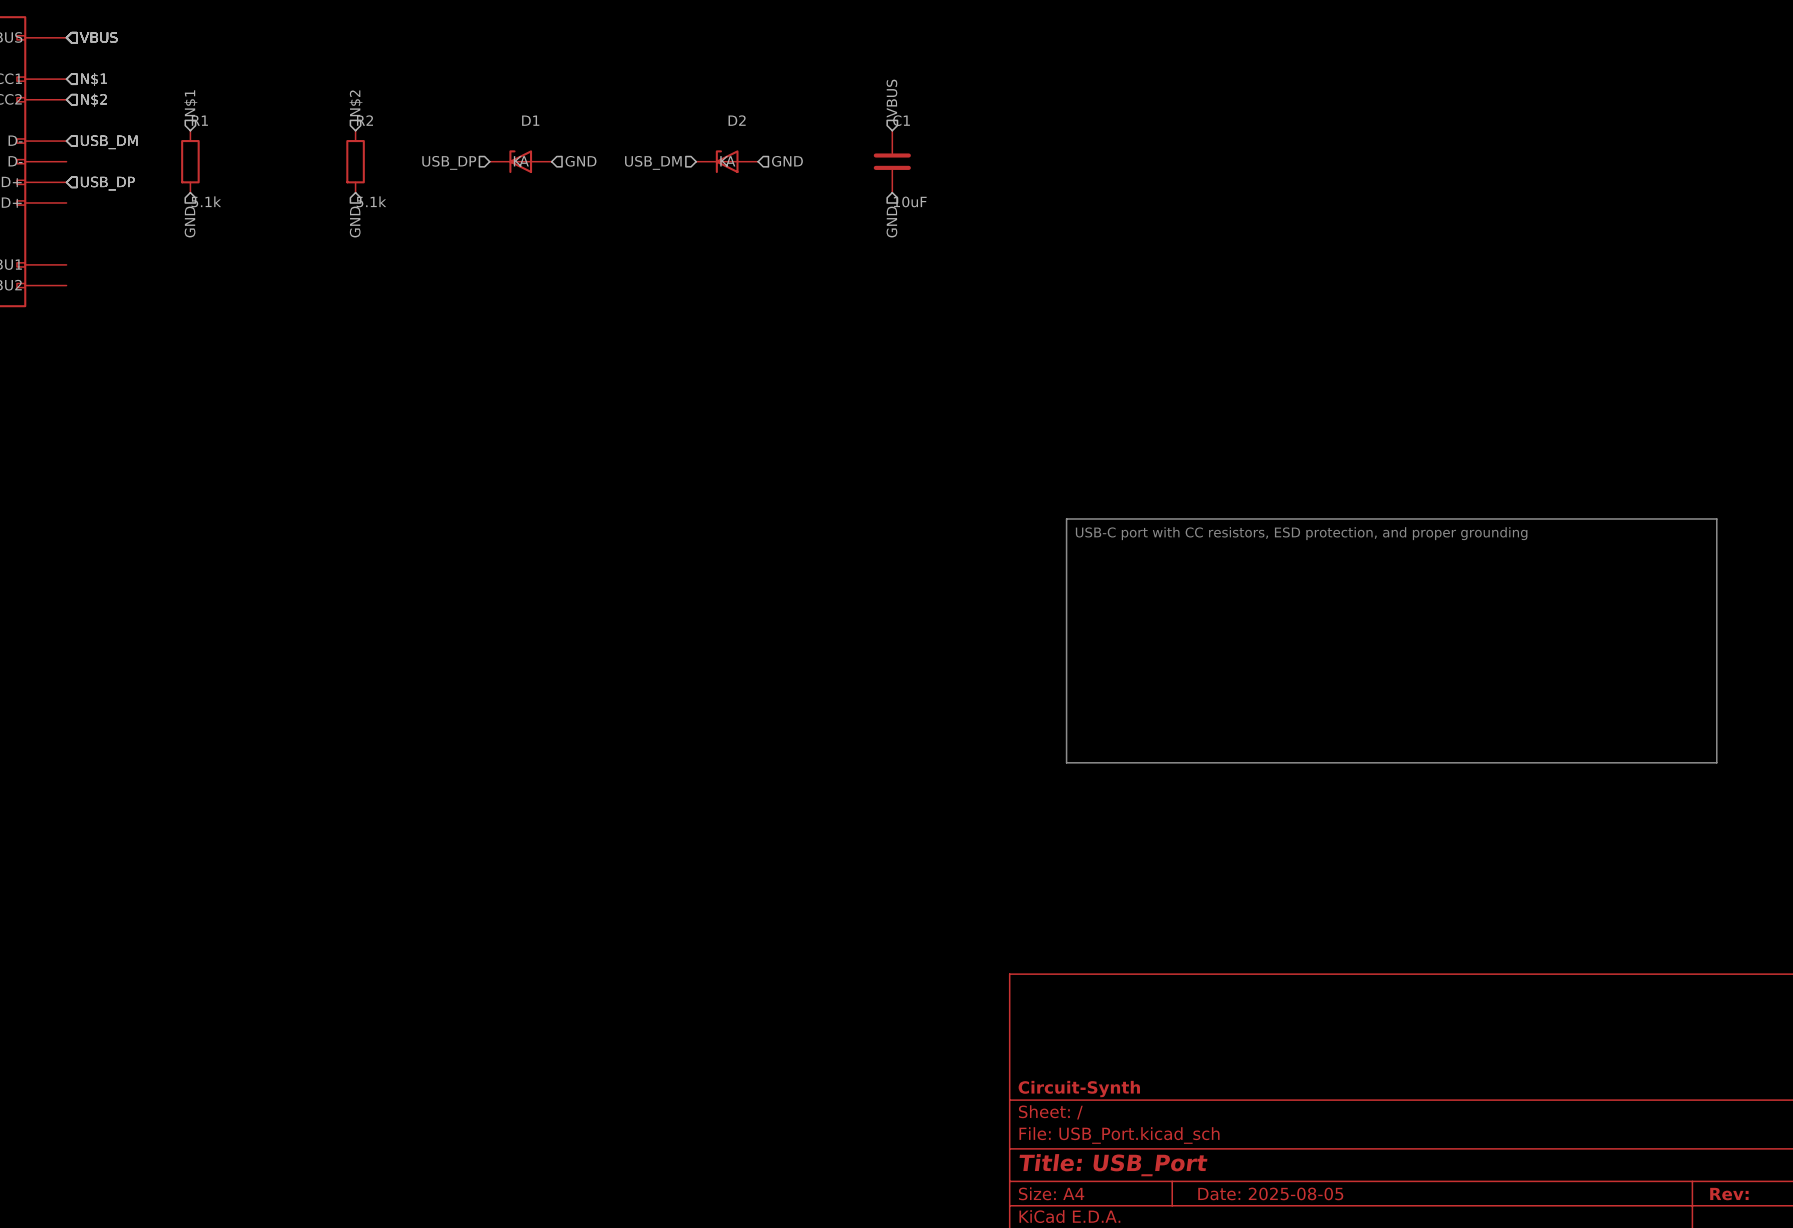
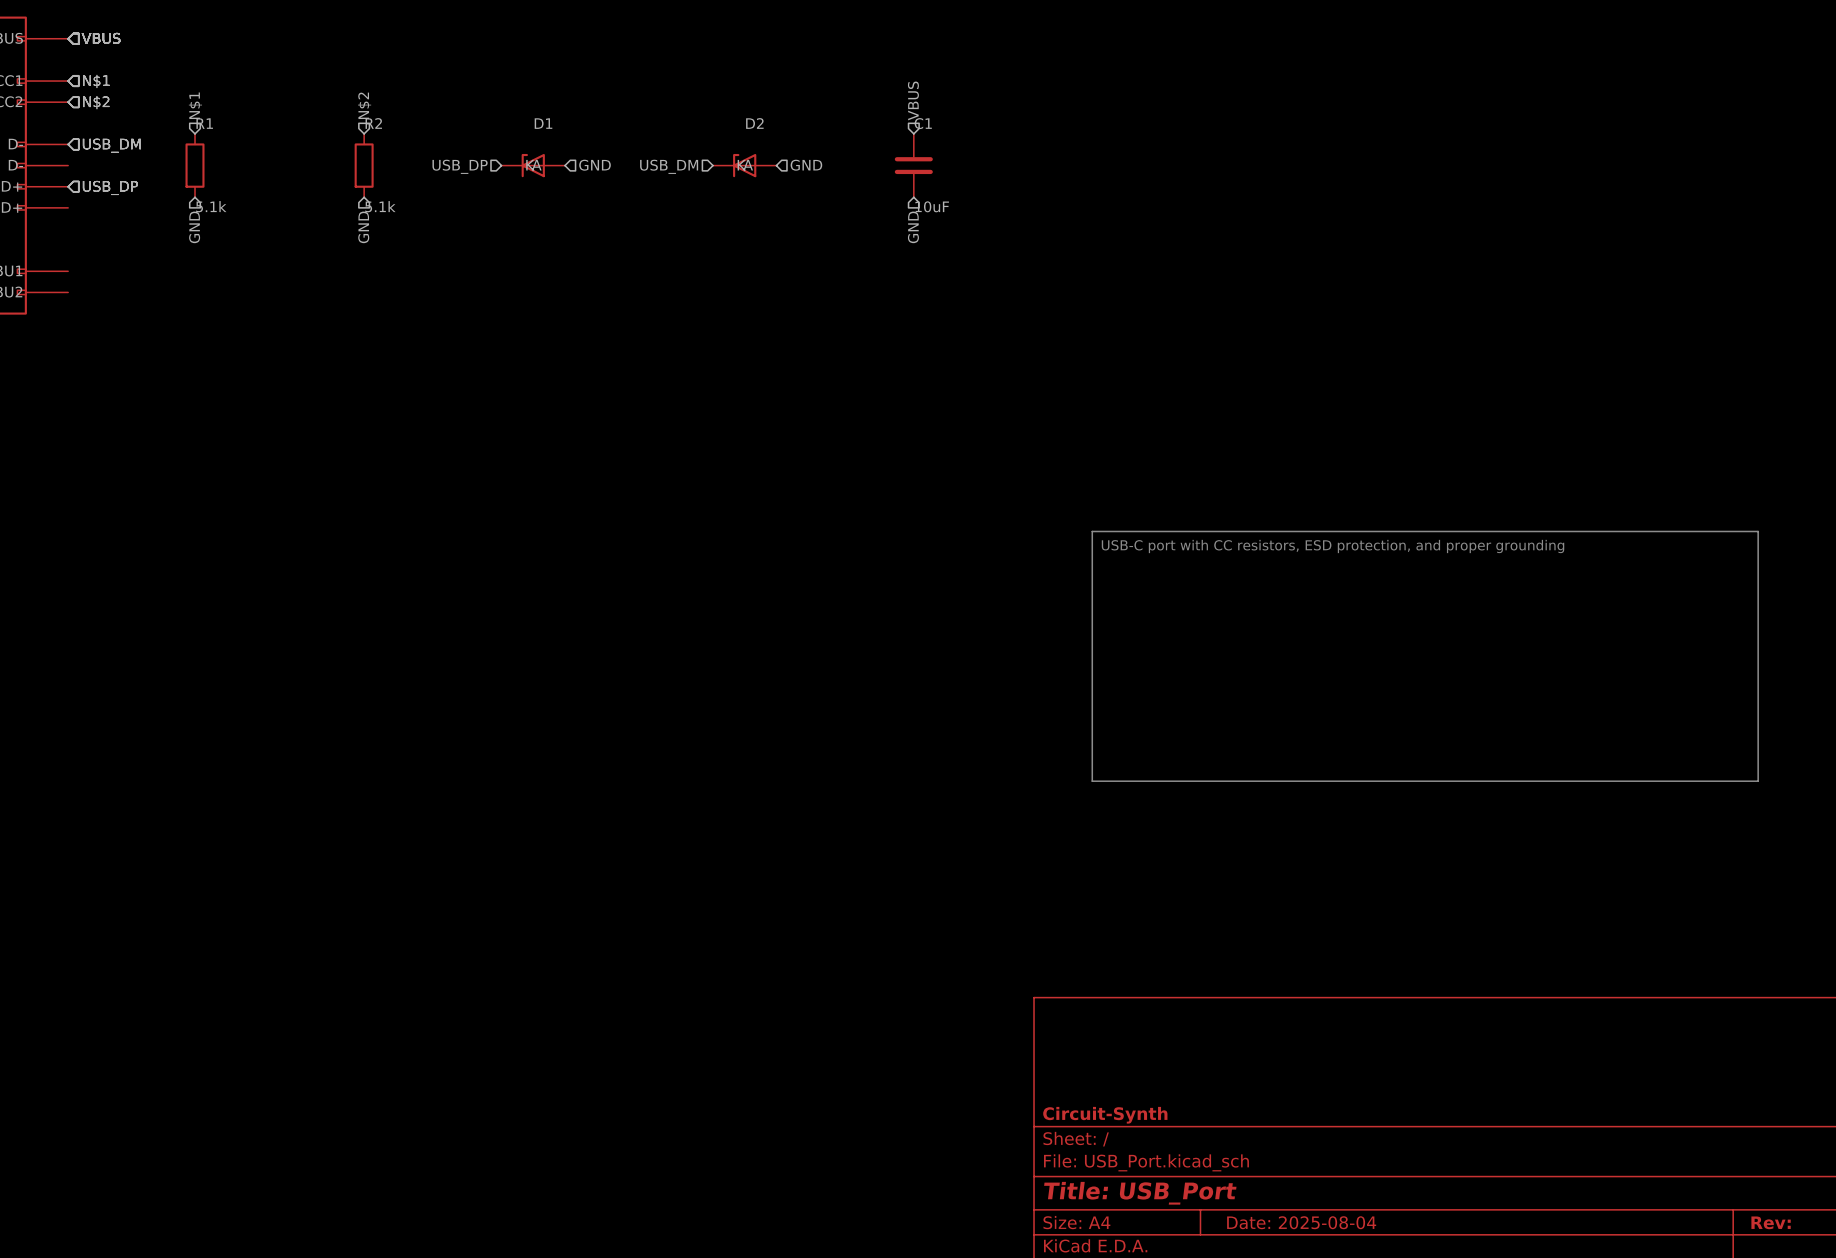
title block: Date: 2025-08-05 (1270, 1193) -> Date: 2025-08-04 (1301, 1222)

